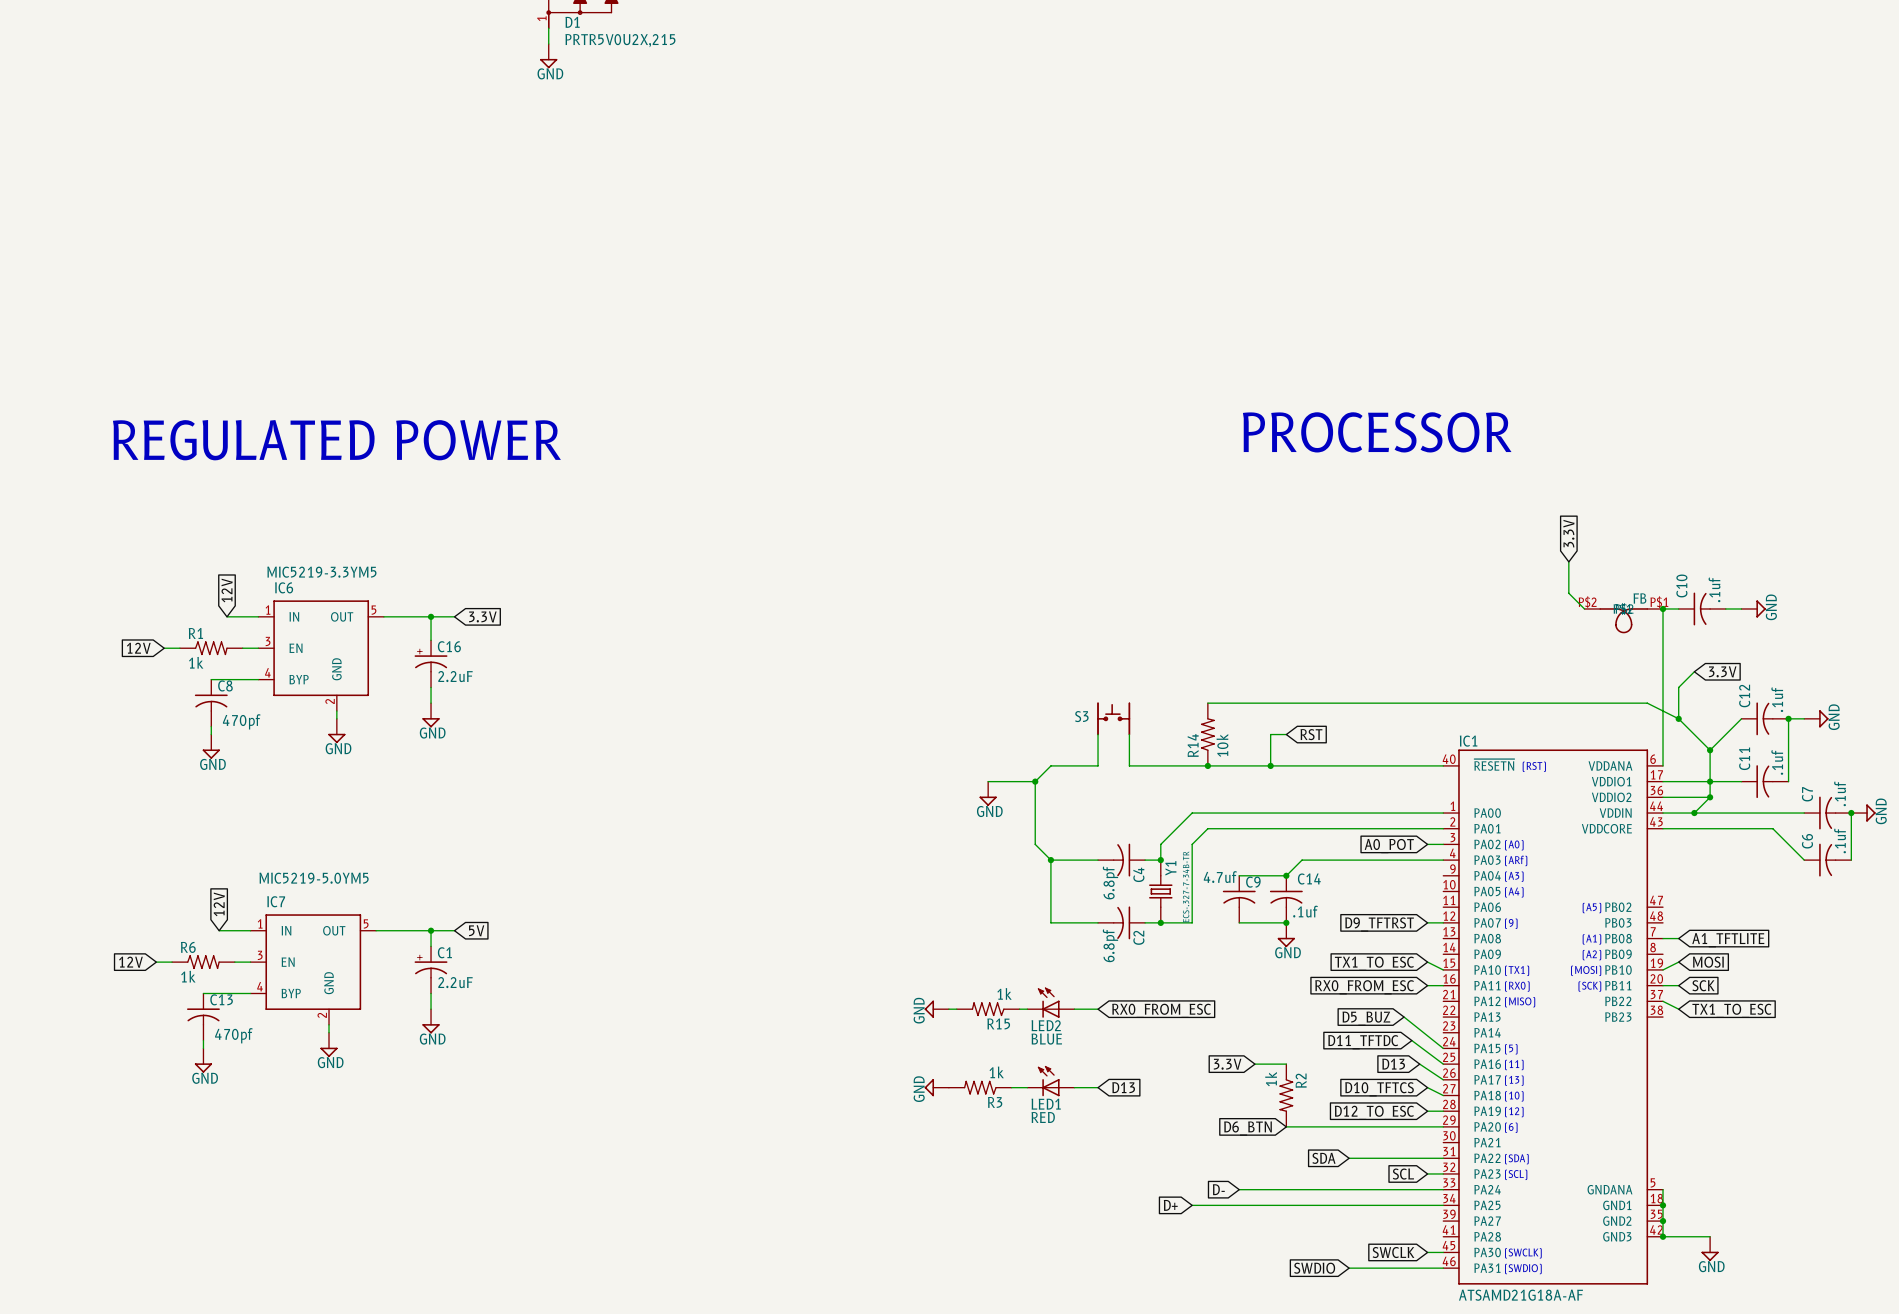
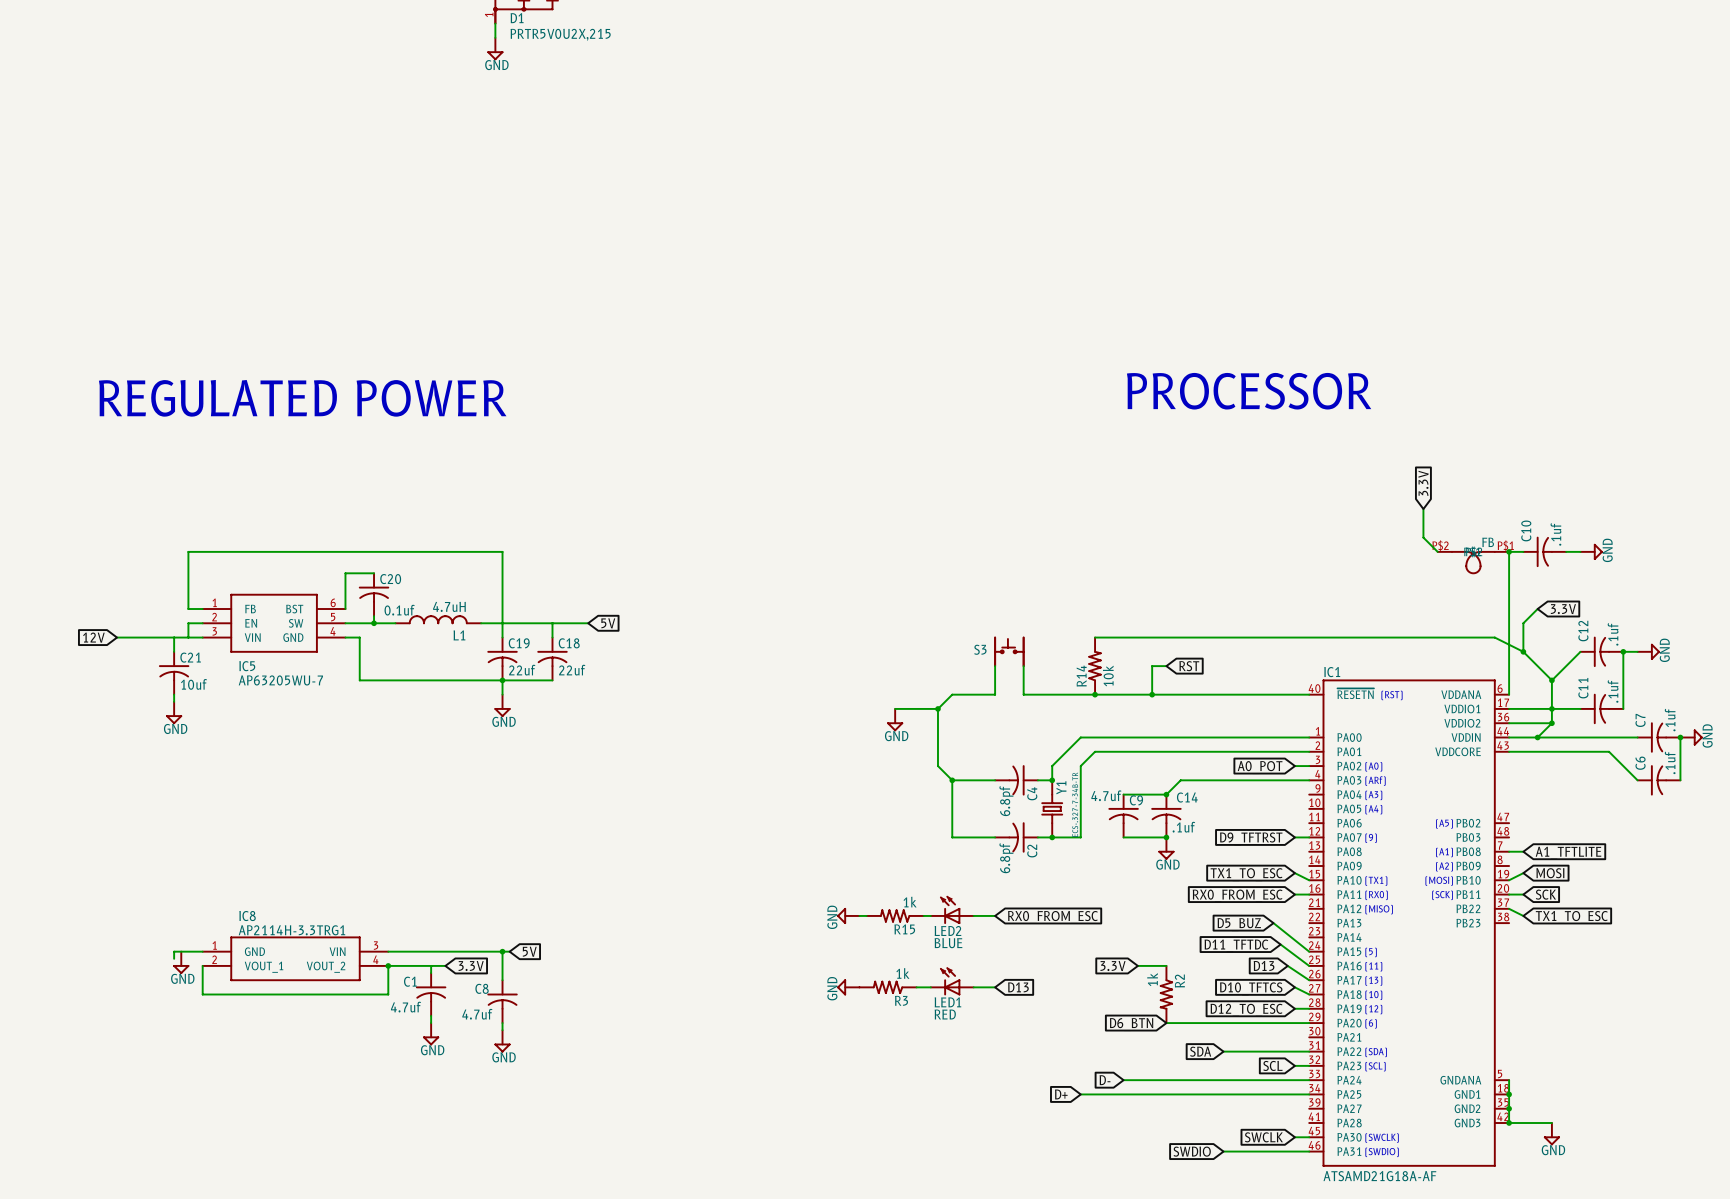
global label: 12V (227, 590) -> none
wire: (226, 616) (258, 616) -> none
wire: (383, 616) (454, 616) -> none
wire: (431, 616) (431, 640) -> none
junction: (431, 616) -> none
global label: 3.3V (482, 616) -> none
wire: none -> (374, 573) (345, 573) (345, 609)
global label position: 12V (138, 648) -> 12V (93, 637)
wire: (164, 648) (179, 648) -> none
R1: 1k (211, 648) -> none
wire: (242, 648) (258, 648) -> none
IC6: MIC5219-3.3YM5 (321, 655) -> none
C20: none -> 0.1uf (374, 594)
C16: 2.2uF (431, 663) -> none
wire: none -> (202, 609) (188, 609) (188, 551) (502, 551) (502, 637)
wire: (211, 679) (258, 679) -> none
L1: none -> 4.7uH (438, 619)
C8 name position: C8 (225, 685) -> C8 (482, 988)
IC5: none -> AP63205WU-7 (274, 623)
wire: none -> (345, 623) (395, 623)
junction: none -> (374, 623)
wire: (431, 687) (431, 703) -> (502, 680) (502, 694)
wire: none -> (481, 623) (588, 623)
wire: none -> (552, 623) (552, 637)
global label: none -> 5V (608, 623)
wire: none -> (117, 637) (202, 637)
wire: none -> (174, 637) (174, 651)
C8 position: (211, 703) -> (502, 1001)
wire: none -> (345, 637) (359, 637) (359, 680) (552, 680)
wire: (336, 711) (336, 718) -> (374, 616) (374, 623)
power symbol: GND (431, 715) -> none
C8 value: 470pf (241, 721) -> 4.7uf (477, 1014)
wire: (211, 726) (211, 734) -> (174, 694) (174, 701)
C19: none -> 22uf (502, 658)
C18: none -> 22uf (552, 658)
power symbol: GND (336, 731) -> none
C21: none -> 10uf (174, 673)
power symbol position: GND (211, 746) -> GND (174, 712)
junction: none -> (502, 680)
power symbol: none -> GND (502, 705)
global label: 12V (219, 904) -> none
wire: (219, 930) (250, 930) -> none
wire: (376, 930) (454, 930) -> none
wire: (431, 930) (431, 946) -> none
junction: (431, 930) -> none
global label: 5V (476, 930) -> none
C1 symbol: [414, 946, 448, 994] -> [416, 973, 447, 1016]
C1 name position: C1 (444, 952) -> C1 (410, 981)
global label: 12V (130, 962) -> none
wire: (156, 962) (172, 962) -> none
R6: 1k (203, 962) -> none
wire: (234, 962) (250, 962) -> none
IC7: MIC5219-5.0YM5 (313, 969) -> none
C1 value: 2.2uF (455, 982) -> 4.7uf (406, 1007)
wire: (203, 993) (250, 993) -> none
wire: (431, 993) (431, 1009) -> none
C13: 470pf (203, 1017) -> none
power symbol: GND (431, 1021) -> none
wire: (329, 1024) (329, 1032) -> (431, 965) (431, 973)
wire: (203, 1040) (203, 1048) -> none
power symbol: GND (329, 1044) -> none
wire: none -> (202, 951) (174, 951) (174, 958)
wire: none -> (388, 951) (509, 951)
wire: none -> (502, 951) (502, 980)
junction: none -> (502, 951)
global label: none -> 5V (529, 951)
IC8: none -> AP2114H-3.3TRG1 (295, 958)
wire: none -> (202, 965) (202, 994) (388, 994) (388, 965) (445, 965)
junction: none -> (388, 965)
global label: none -> 3.3V (471, 966)
wire: none -> (431, 1015) (431, 1023)
wire: none -> (502, 1023) (502, 1030)
power symbol: none -> GND (431, 1034)
power symbol: none -> GND (502, 1041)

